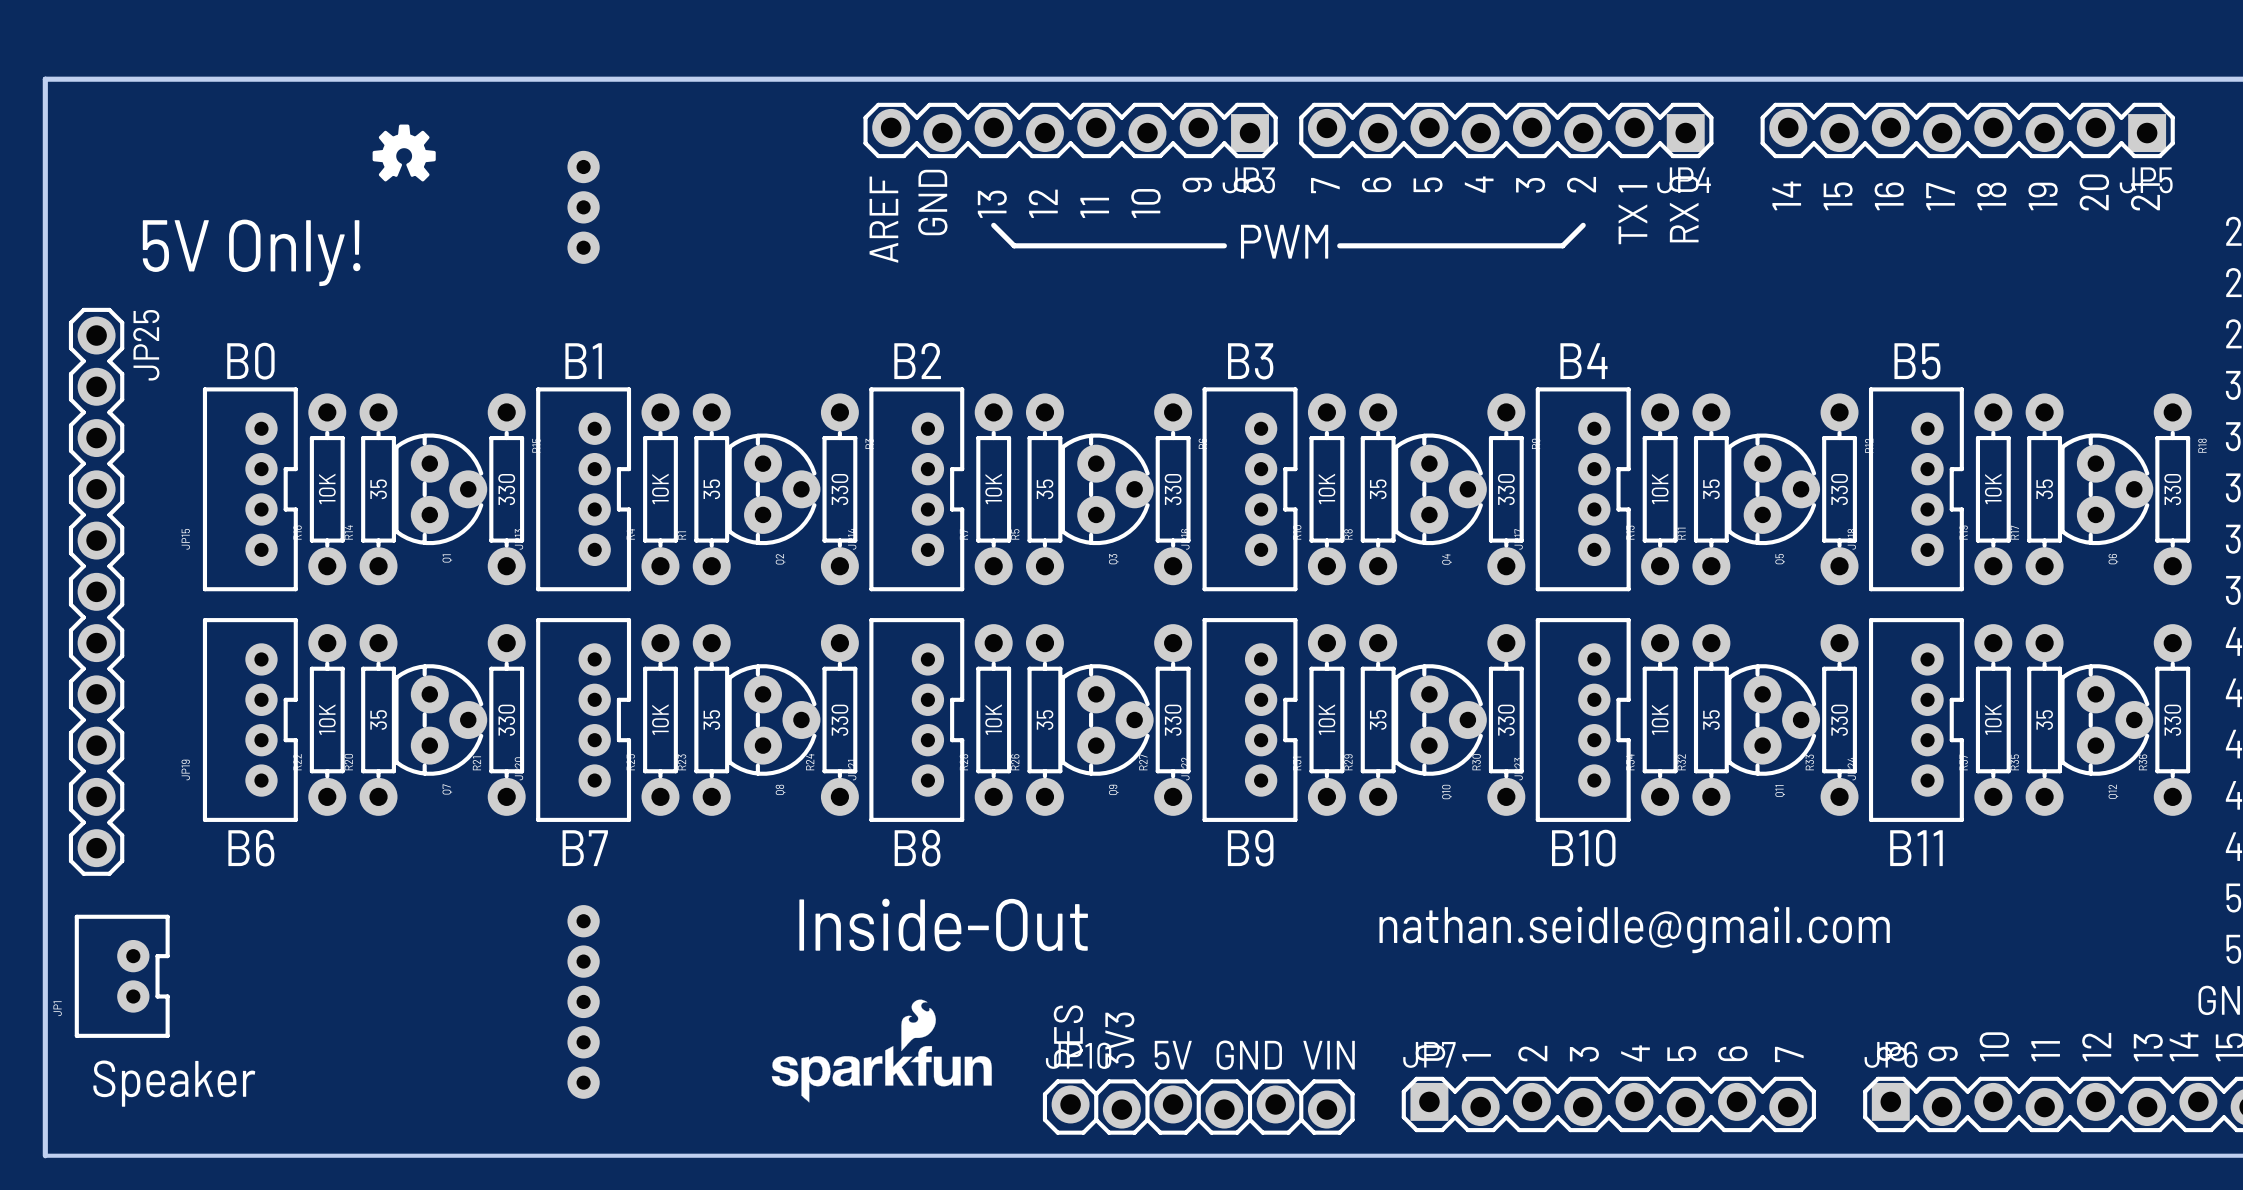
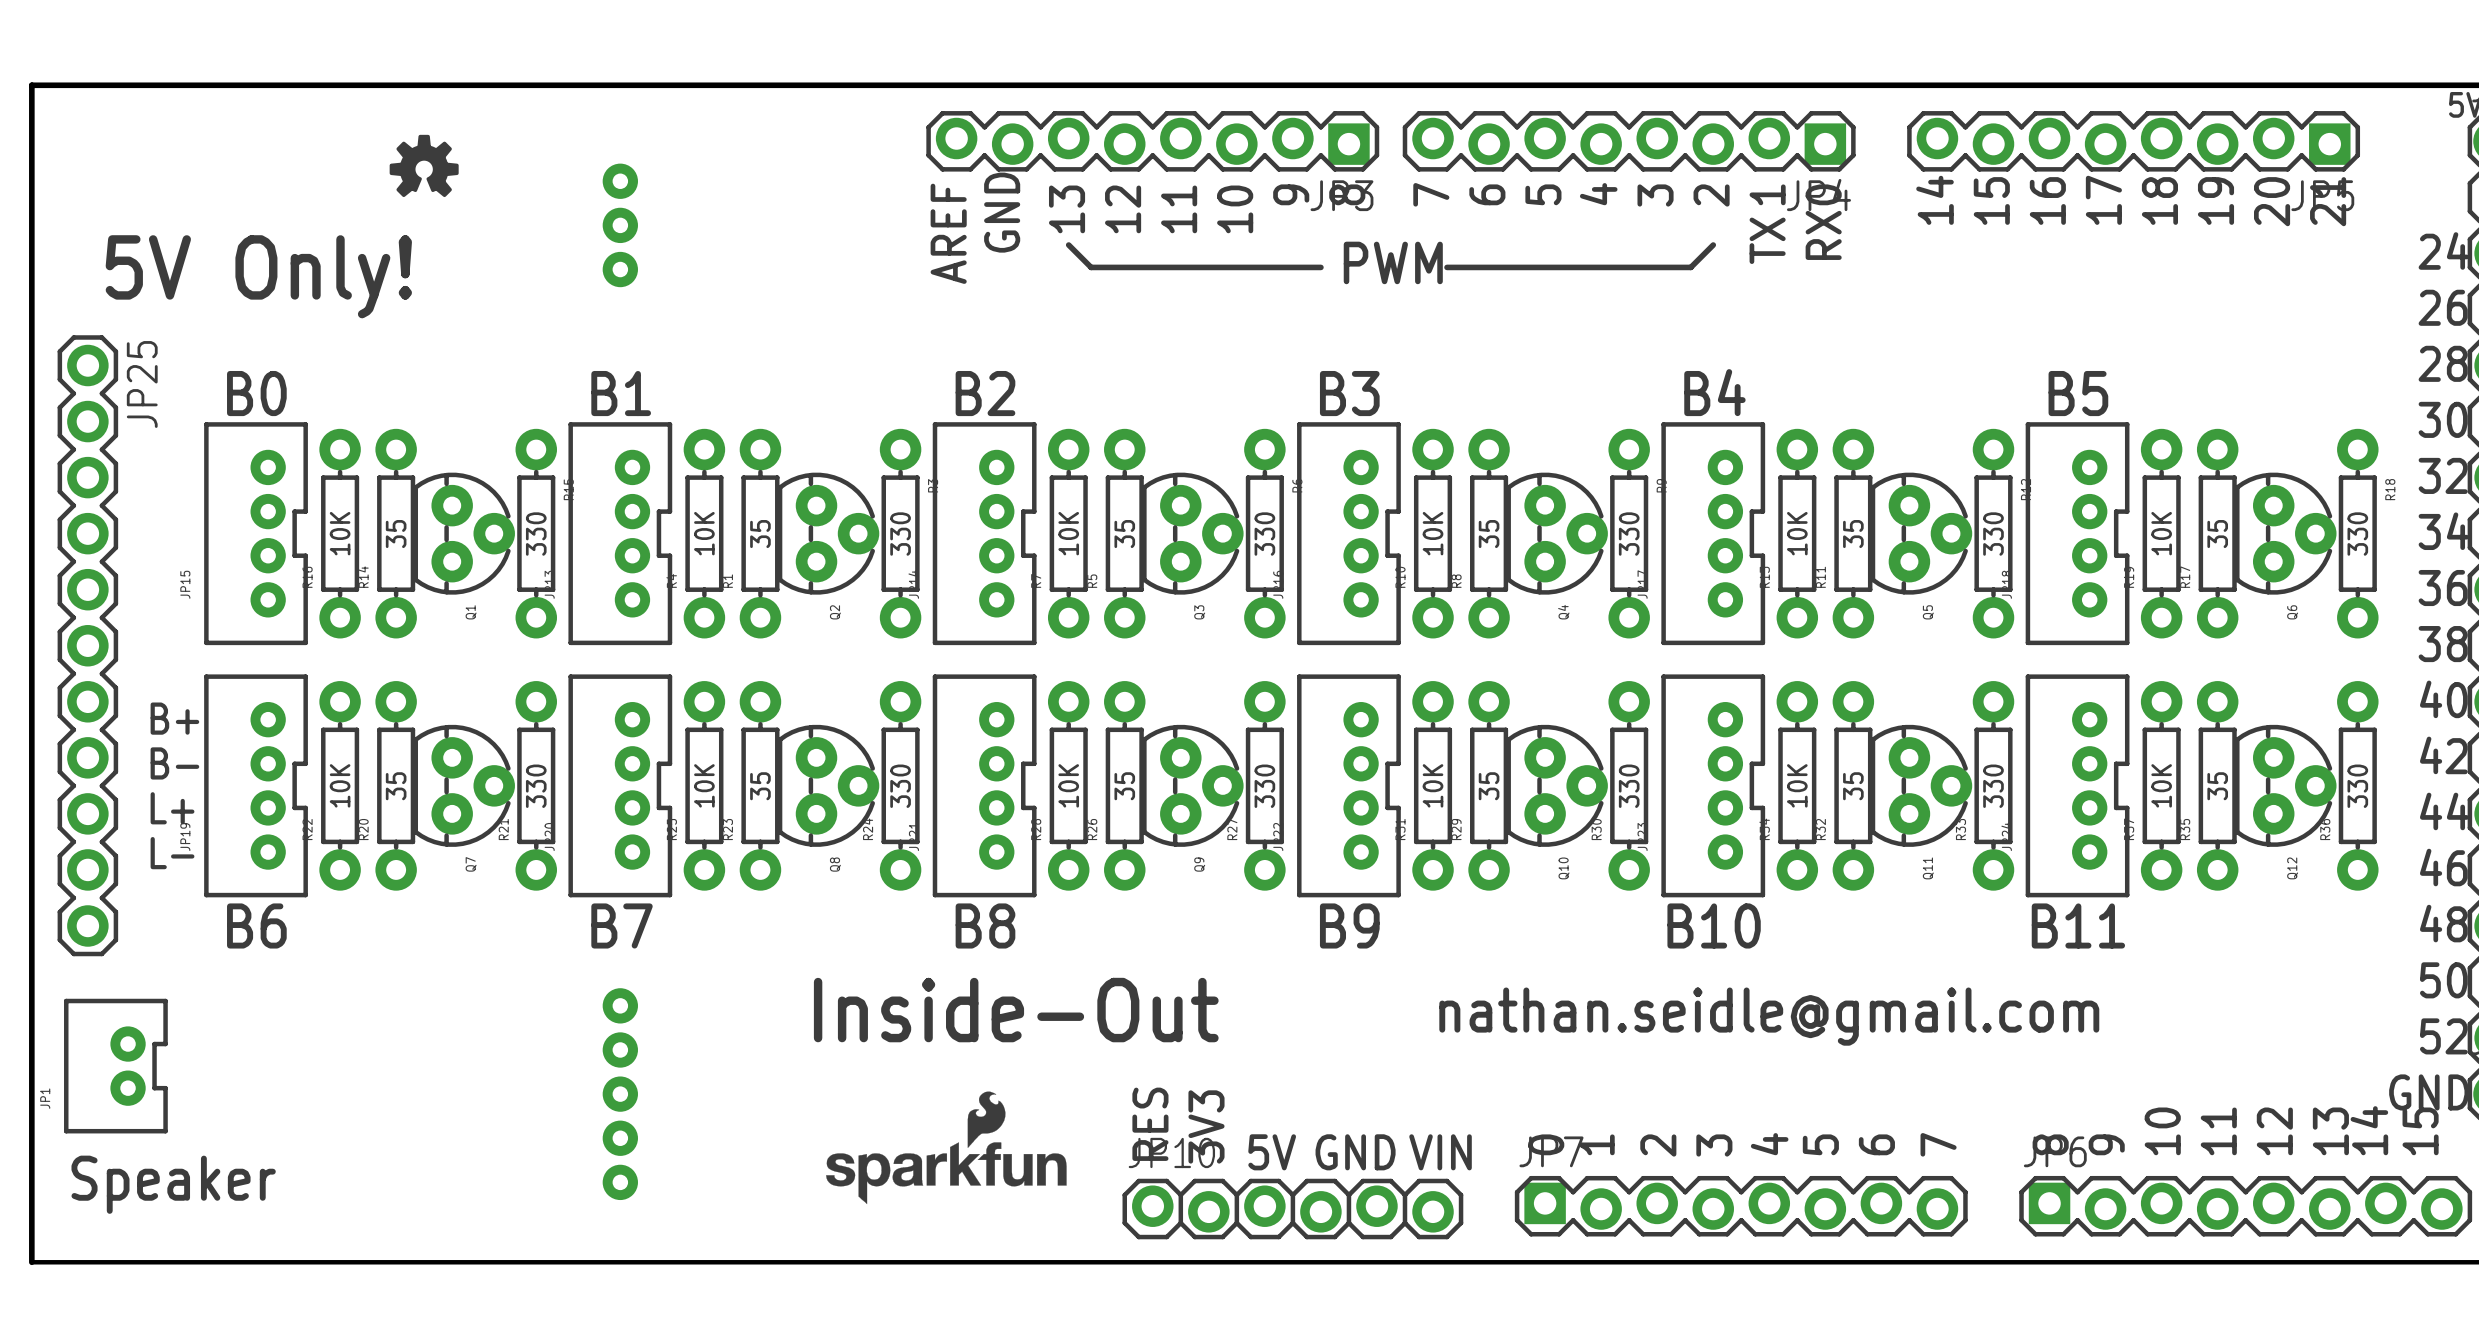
text: none -> B+ (174, 718)
text: none -> B- (174, 763)
text: none -> L+ (172, 808)
text: none -> L- (172, 853)

